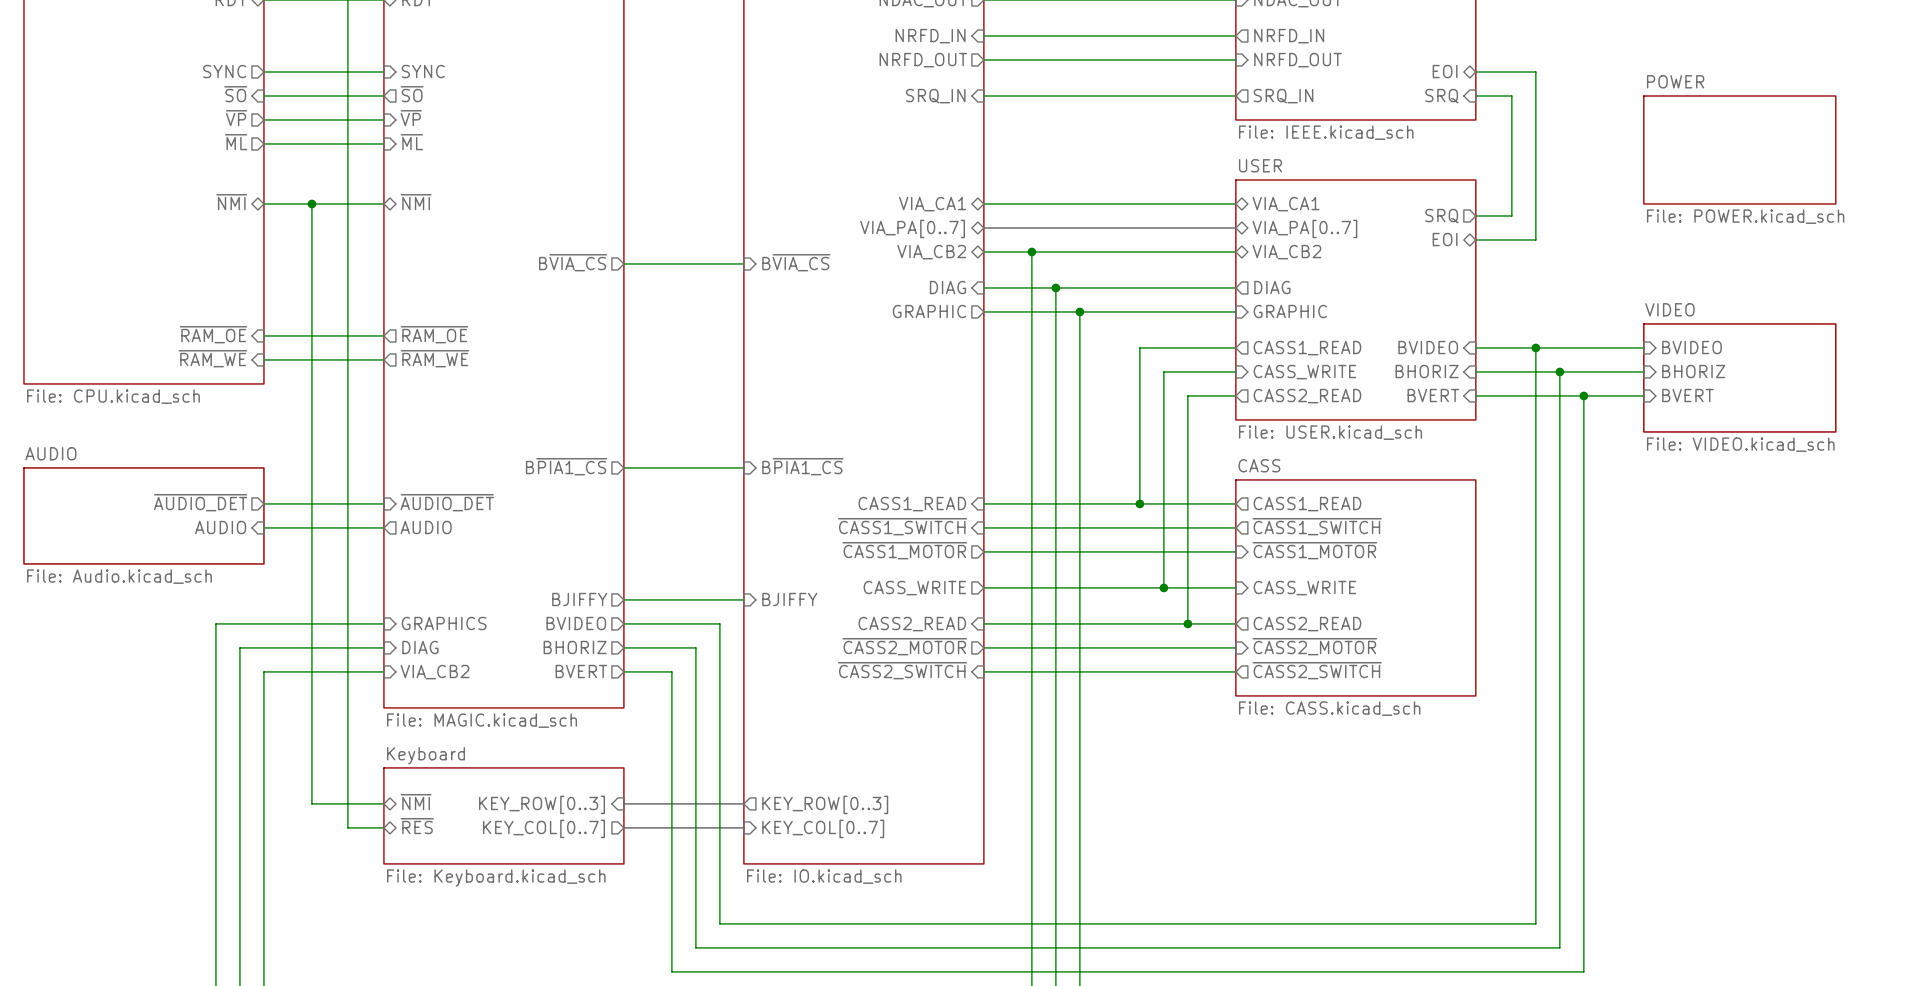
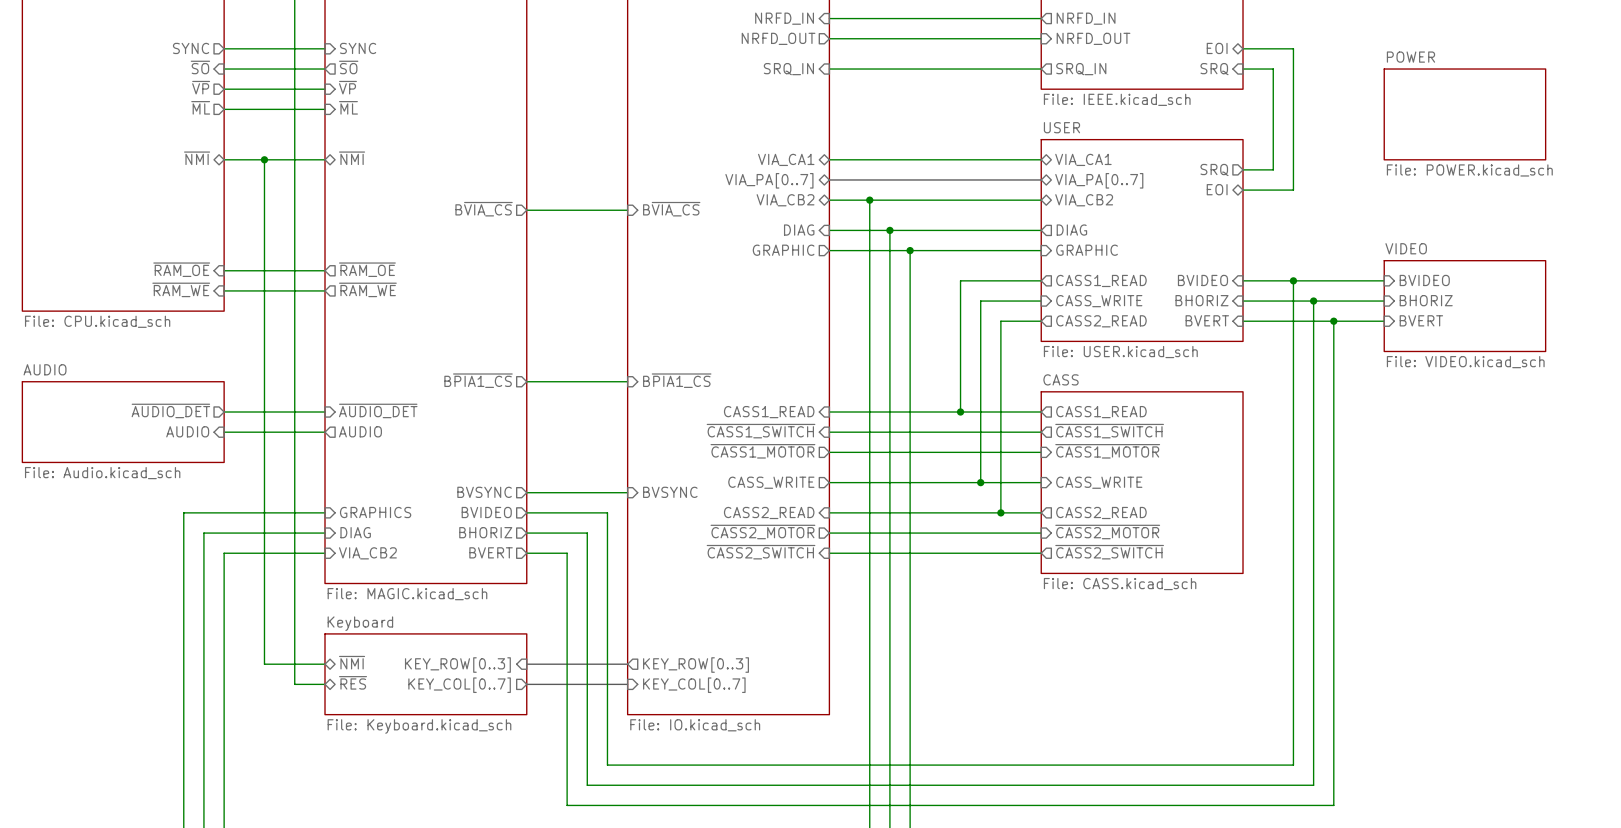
sheet pin: BJIFFY (579, 599) -> BVSYNC (484, 492)
sheet pin: BJIFFY (789, 599) -> BVSYNC (670, 492)

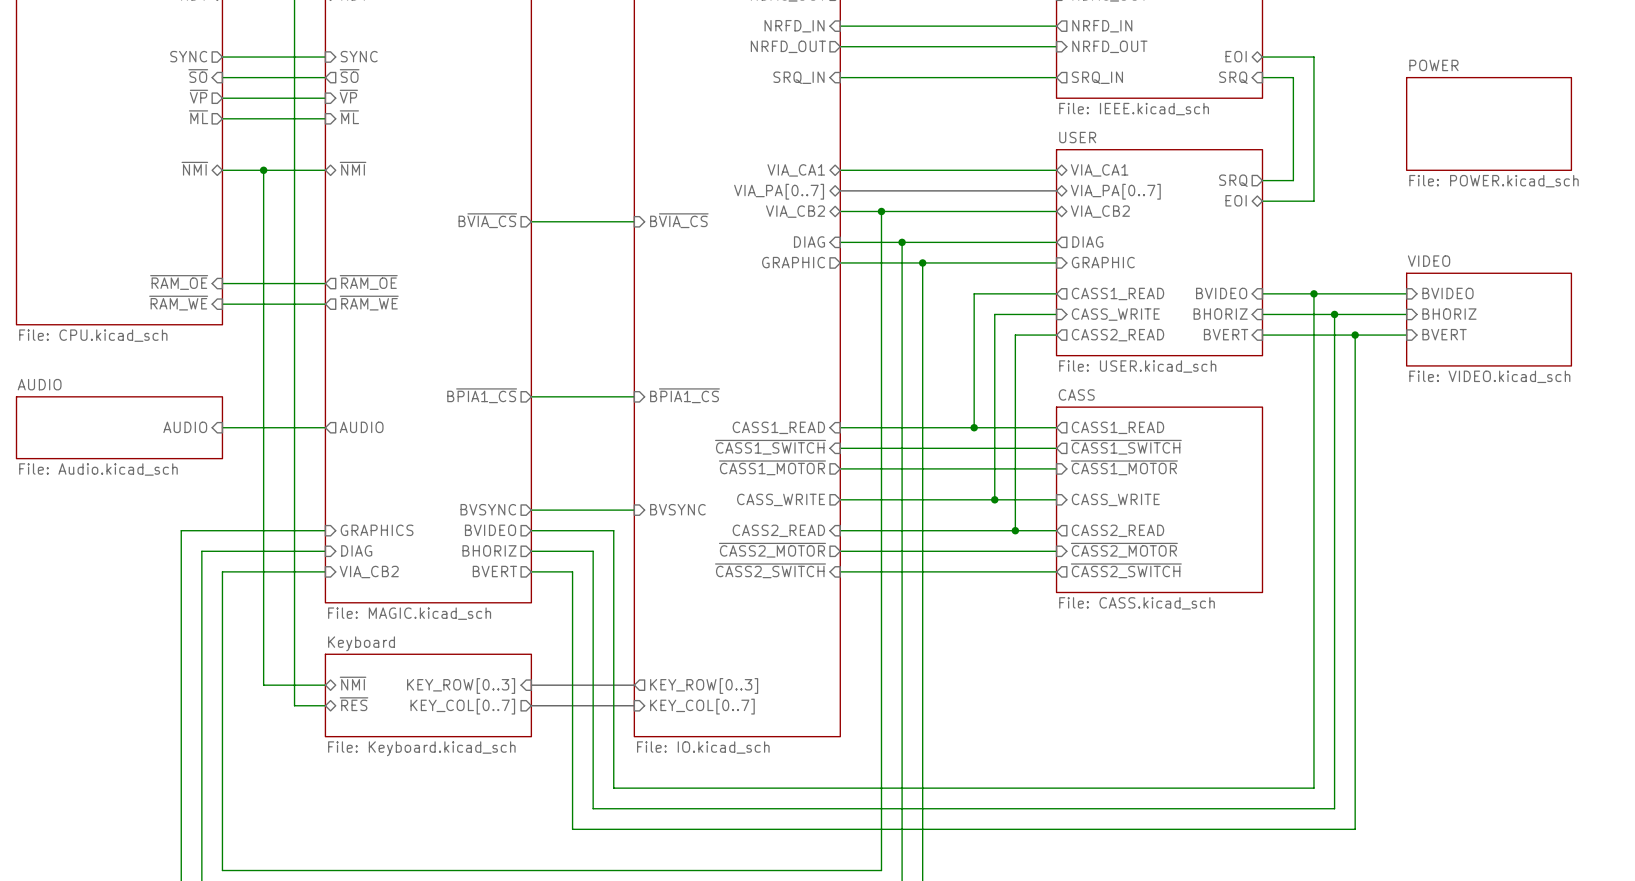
sheet pin shape: output (170, 410) -> input (185, 427)
sheet pin: ~{AUDIO_DET} (170, 410) -> AUDIO (185, 427)
sheet pin shape: input (378, 410) -> output (361, 427)
sheet pin: ~{AUDIO_DET} (378, 410) -> AUDIO (361, 427)
sheet AUDIO: none -> File: Audio.kicad_sch (119, 427)
sheet AUDIO: File: Audio.kicad_sch (123, 422) -> none
sheet pin: AUDIO (187, 431) -> none
sheet pin: AUDIO (360, 431) -> none
wire: (224, 432) (325, 432) -> none

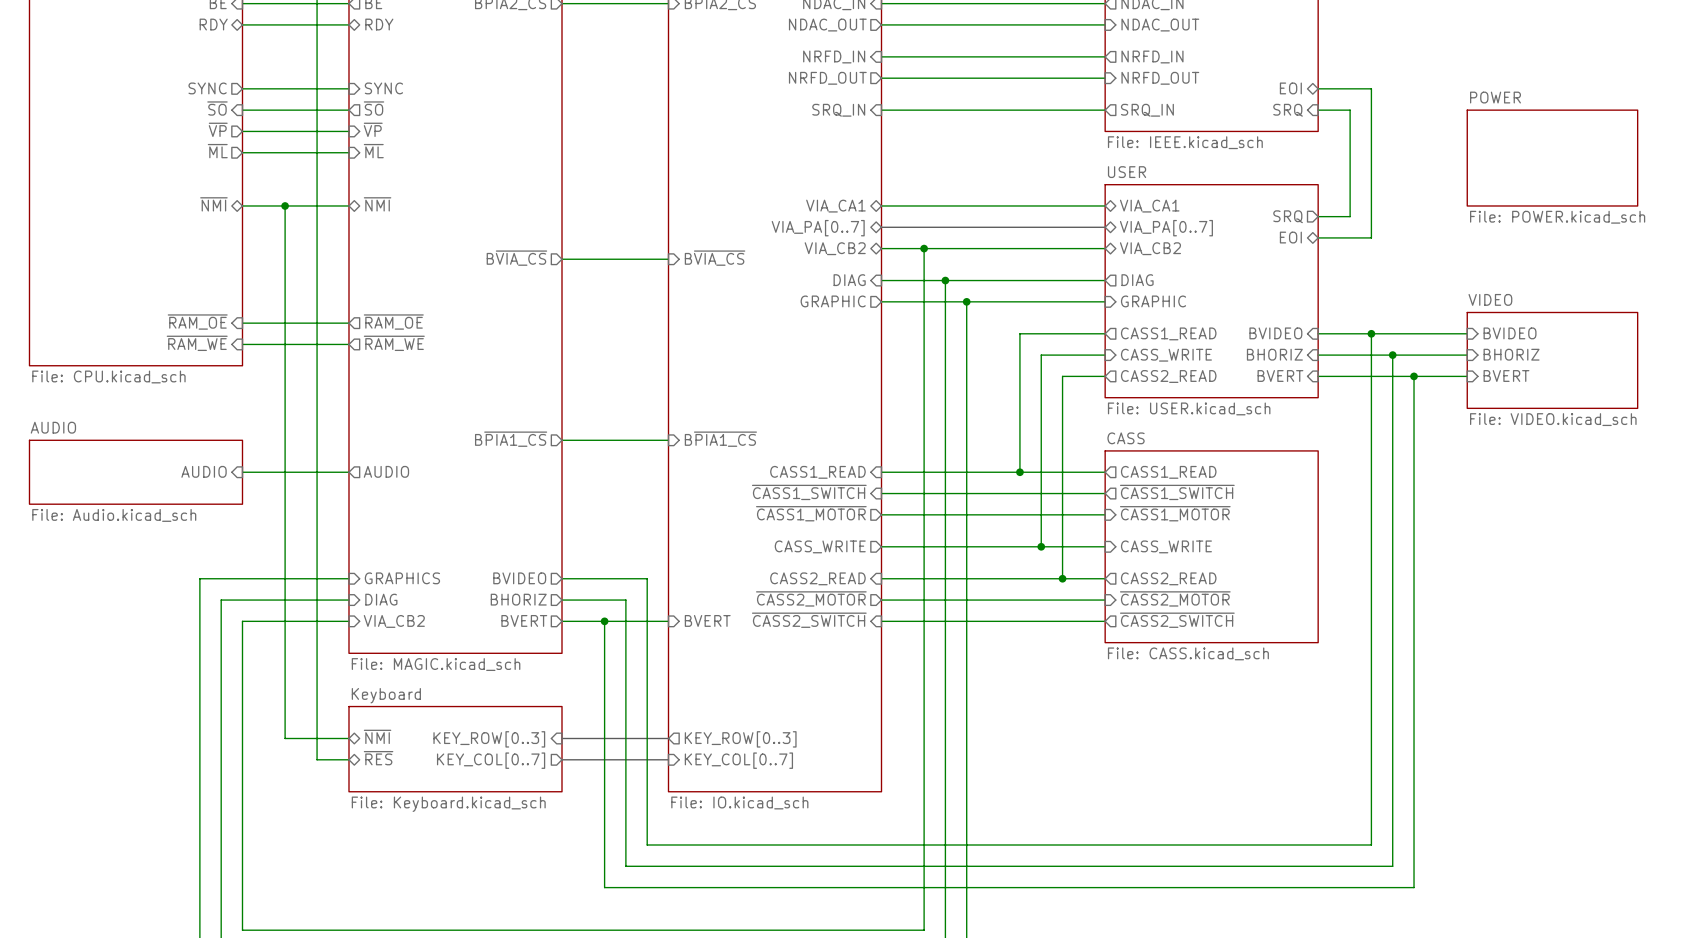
sheet pin: BVSYNC (488, 509) -> none
sheet pin: BVSYNC (677, 509) -> none
wire: (531, 510) (634, 510) -> none
wire: none -> (604, 621) (668, 621)
junction: none -> (604, 621)
sheet pin: none -> BVERT (707, 620)

